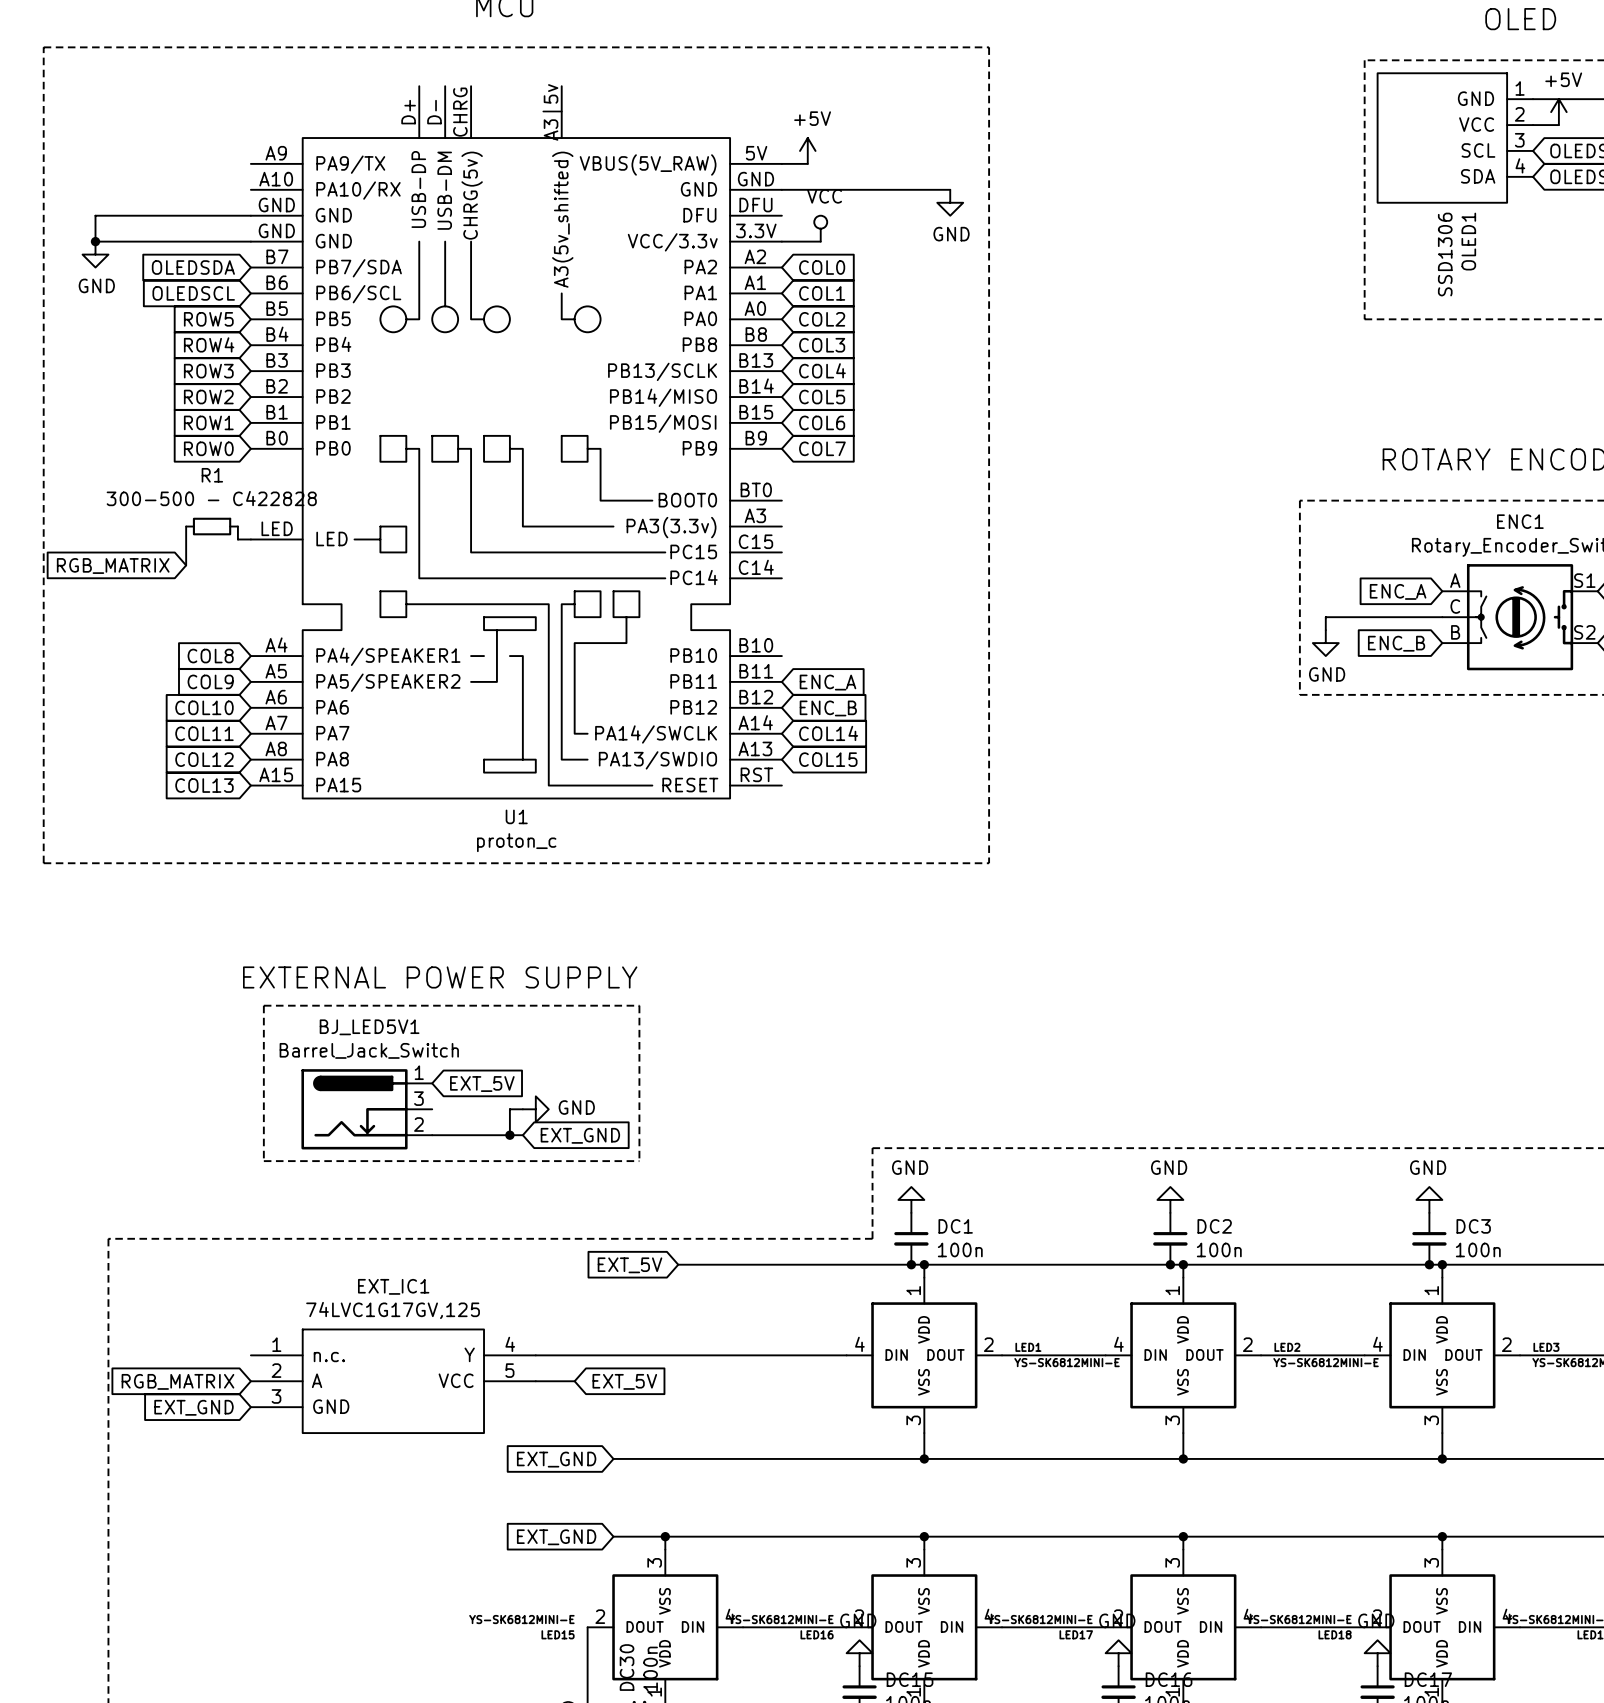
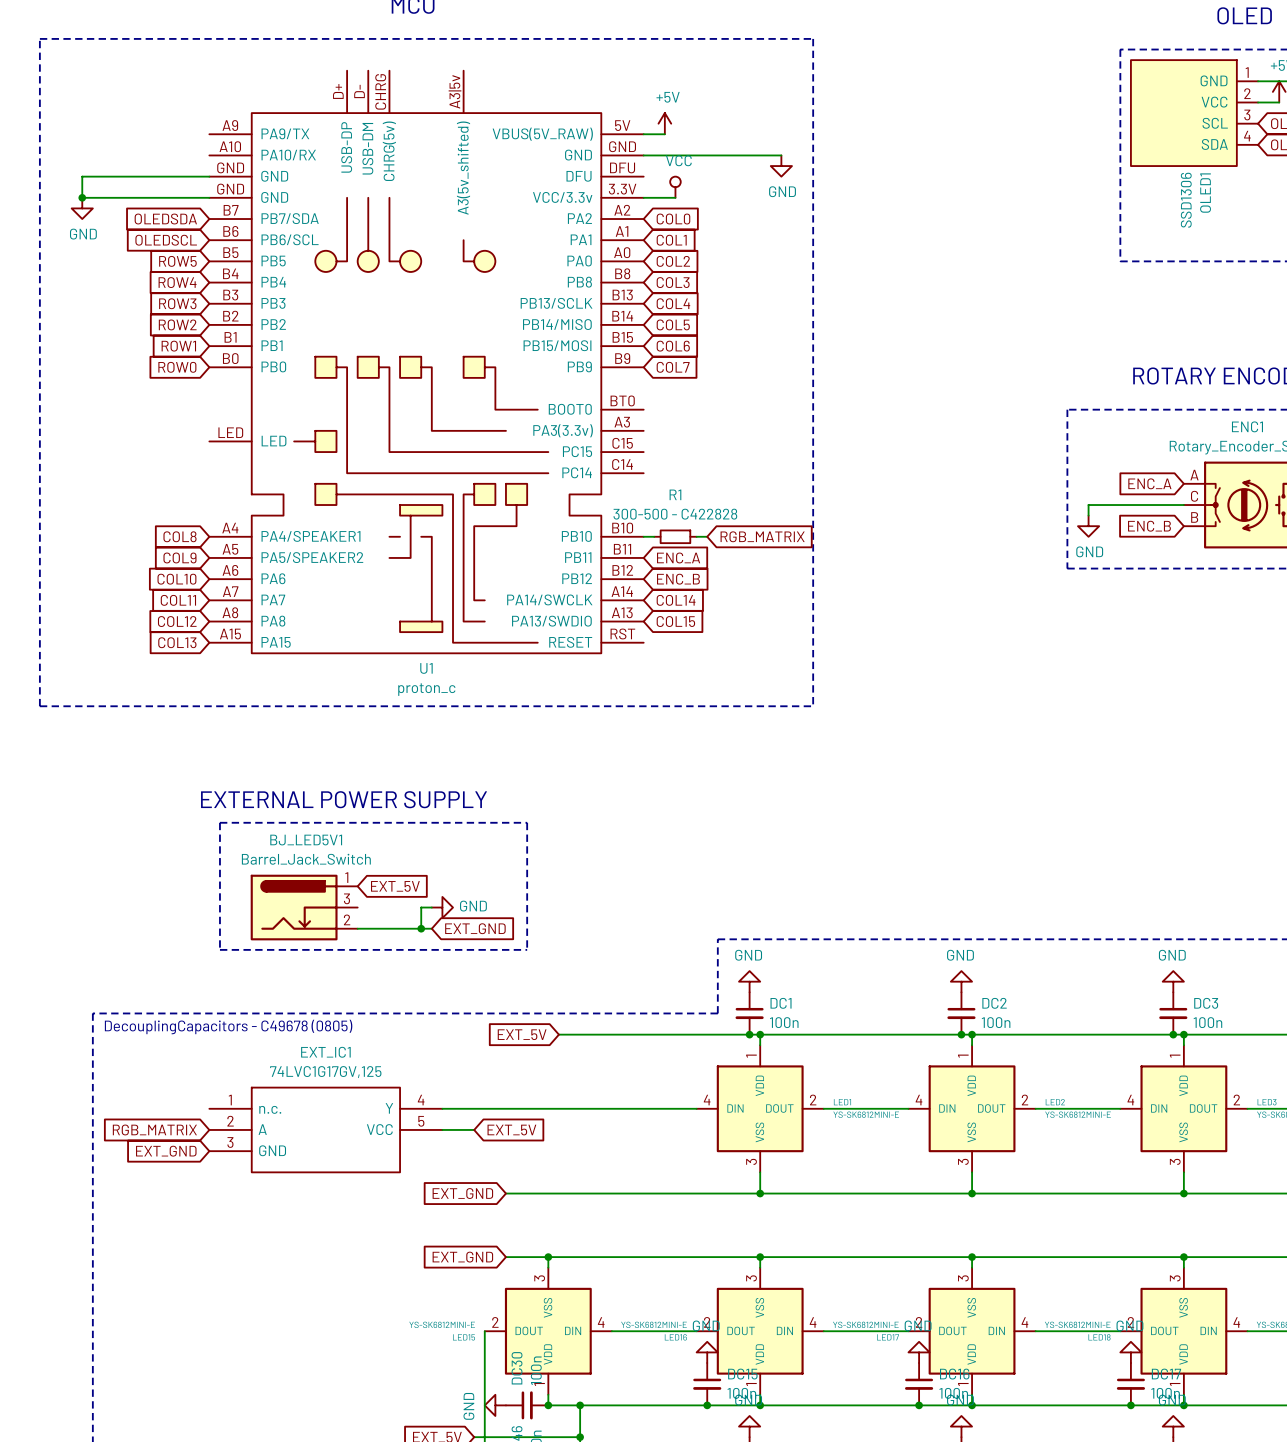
wire: (186, 526) (186, 565) -> none
R1 position: (212, 526) -> (675, 536)
wire: (237, 526) (237, 539) (250, 539) -> none
global label: RGB_MATRIX (113, 566) -> none
wire: none -> (643, 536) (654, 536)
wire: none -> (696, 536) (707, 536)
global label: none -> RGB_MATRIX (762, 536)
text: none -> DecouplingCapacitors - C49678 (0805) (228, 1026)

